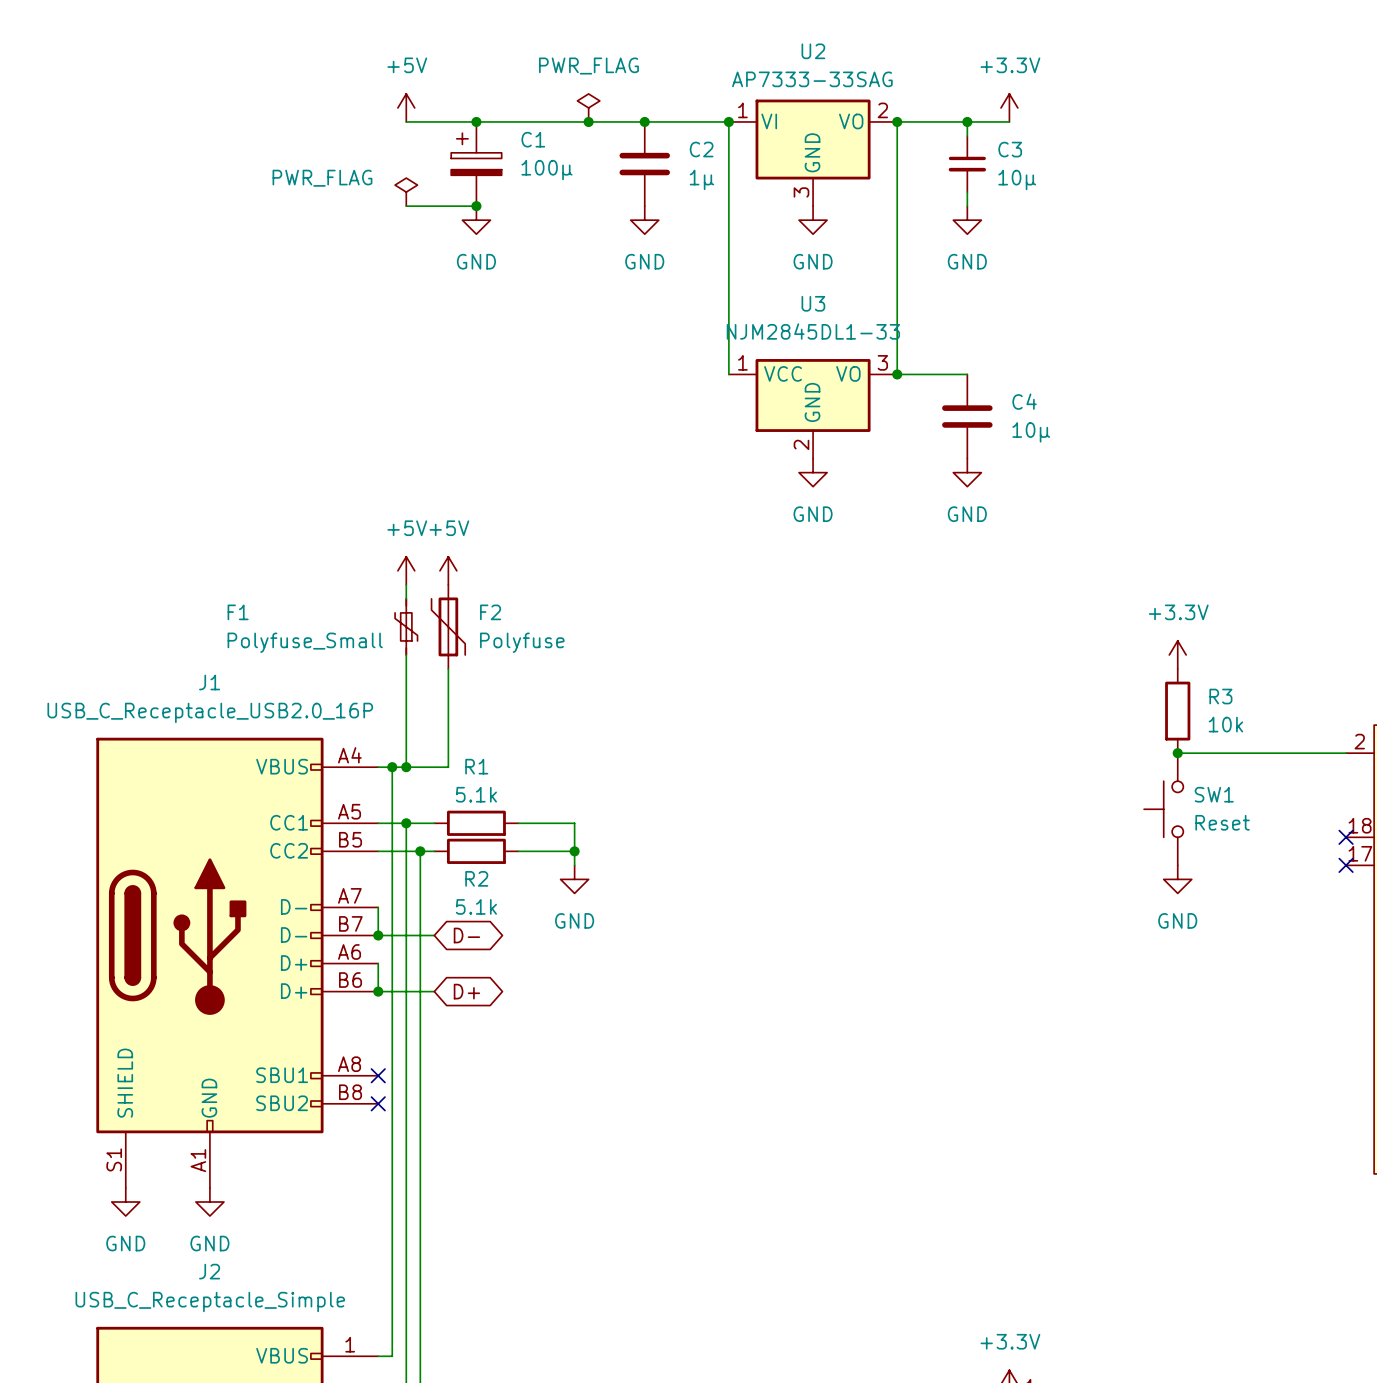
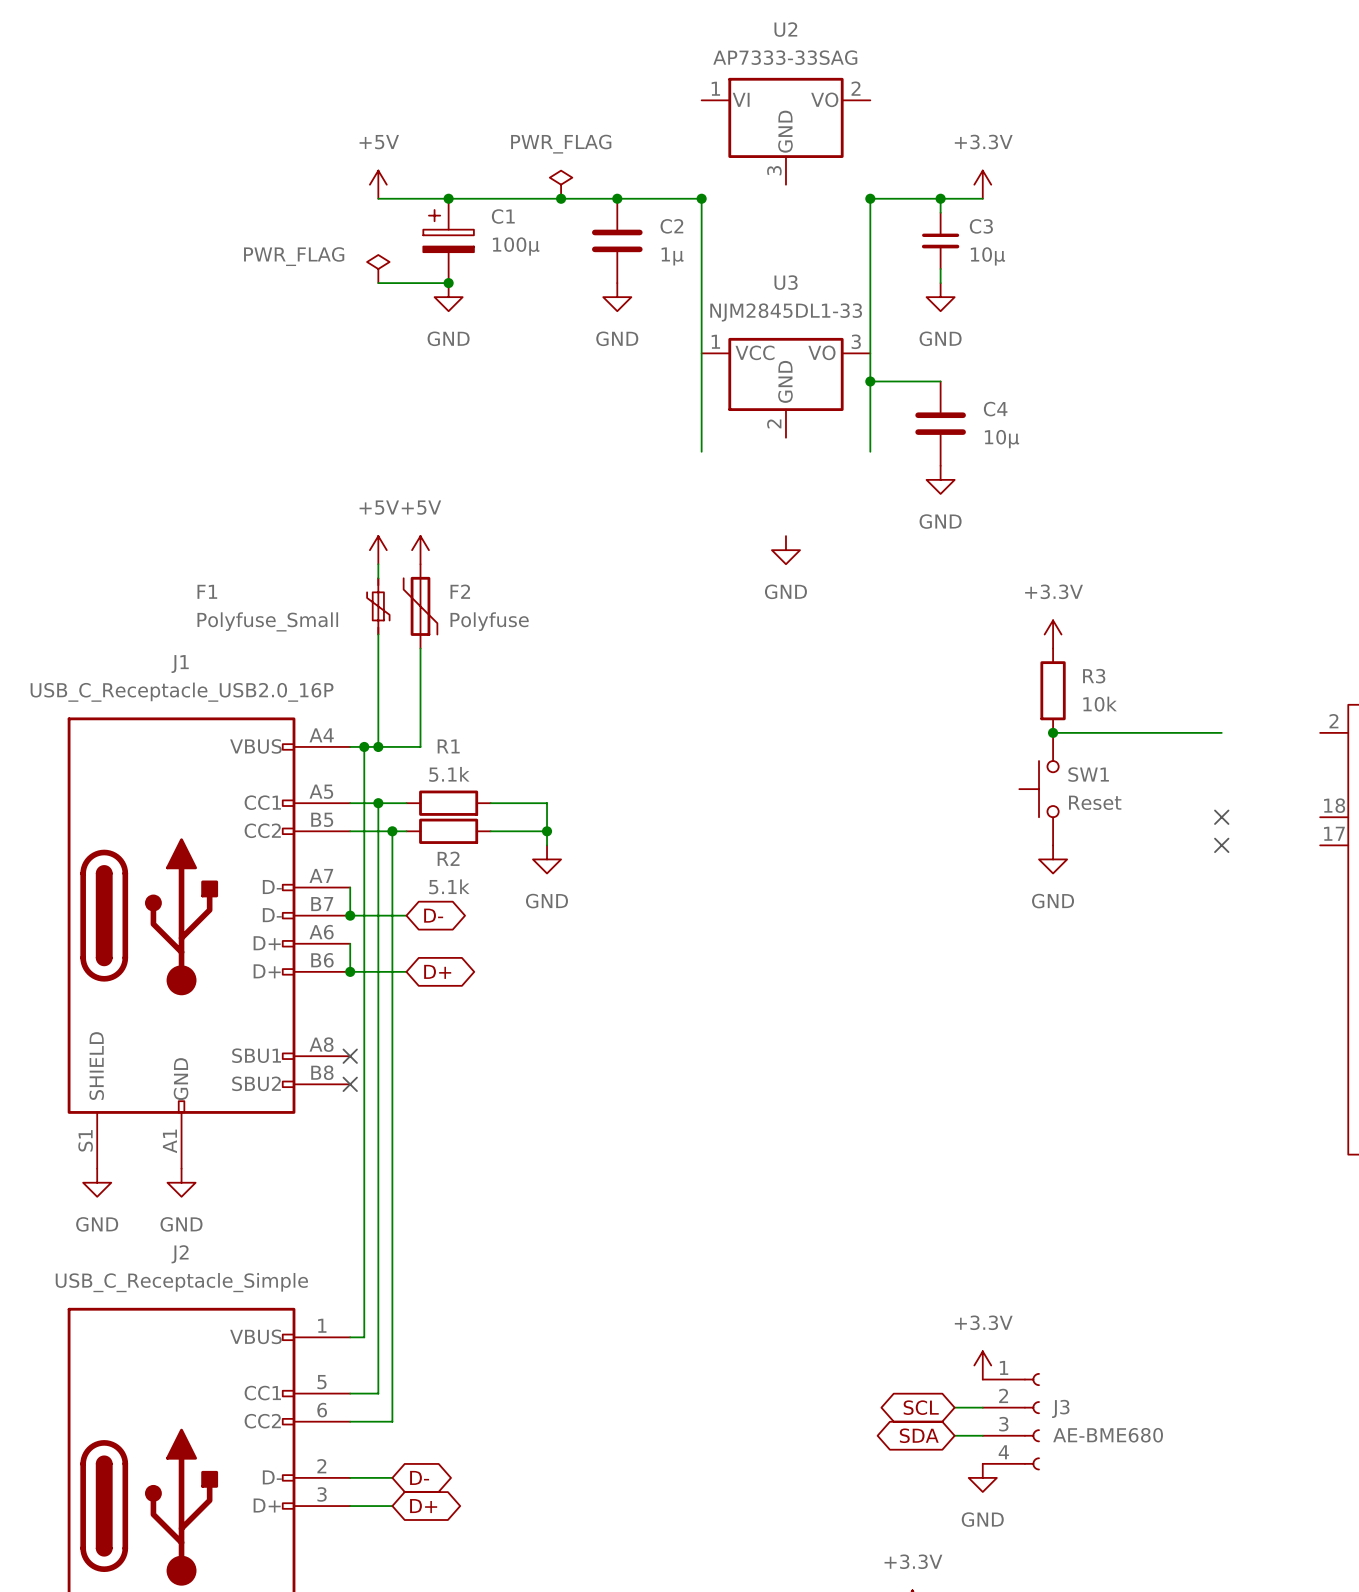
power symbol position: +5V (406, 107) -> +5V (378, 184)
power symbol: PWR_FLAG (588, 107) -> none
power symbol position: +3.3V (1009, 107) -> +3.3V (982, 184)
wire: (406, 121) (728, 121) (728, 220) -> (378, 198) (701, 198)
junction: (476, 121) -> none
junction: (588, 121) -> none
junction: (644, 121) -> none
junction: (728, 121) -> none
junction: (897, 121) -> none
wire: (967, 121) (967, 136) -> (940, 198) (940, 212)
junction: (967, 121) -> none
wire: (1009, 121) (897, 121) (897, 220) -> (982, 198) (870, 198)
C1 position: (476, 164) -> (448, 240)
C2 position: (644, 164) -> (617, 240)
C3 position: (967, 164) -> (940, 240)
power symbol: PWR_FLAG (406, 192) -> none
wire: (967, 192) (967, 206) -> (940, 269) (940, 283)
wire: (406, 206) (476, 206) -> (378, 283) (448, 283)
junction position: (476, 206) -> (448, 198)
power symbol: none -> PWR_FLAG (561, 184)
power symbol: GND (476, 220) -> none
junction: none -> (561, 198)
junction: none -> (617, 198)
power symbol: GND (644, 220) -> none
junction: none -> (701, 198)
power symbol: GND (813, 220) -> none
junction: none -> (870, 198)
junction: none -> (940, 198)
power symbol: GND (967, 220) -> none
power symbol: none -> PWR_FLAG (378, 269)
junction: none -> (448, 283)
power symbol: none -> GND (448, 297)
power symbol: none -> GND (617, 297)
power symbol: none -> GND (940, 297)
wire: none -> (701, 353) (701, 451)
wire: (897, 374) (967, 374) -> (870, 353) (870, 451)
junction position: (897, 374) -> (870, 381)
wire: none -> (870, 381) (940, 381)
C4 position: (967, 416) -> (940, 423)
power symbol: GND (813, 472) -> none
power symbol position: GND (967, 472) -> GND (940, 479)
power symbol: none -> GND (785, 550)
power symbol position: +3.3V (1177, 654) -> +3.3V (1053, 634)
R3 position: (1177, 711) -> (1053, 690)
junction: none -> (1053, 732)
junction: (1177, 753) -> none
wire: (1247, 753) (1346, 753) -> (1053, 732) (1151, 732)
SW1 position: (1163, 809) -> (1039, 789)
no-connect mark: none -> (1221, 817)
no-connect mark: (1346, 837) -> none
no-connect mark: none -> (1221, 845)
no-connect mark: (1346, 865) -> none
power symbol position: GND (1177, 879) -> GND (1053, 859)

